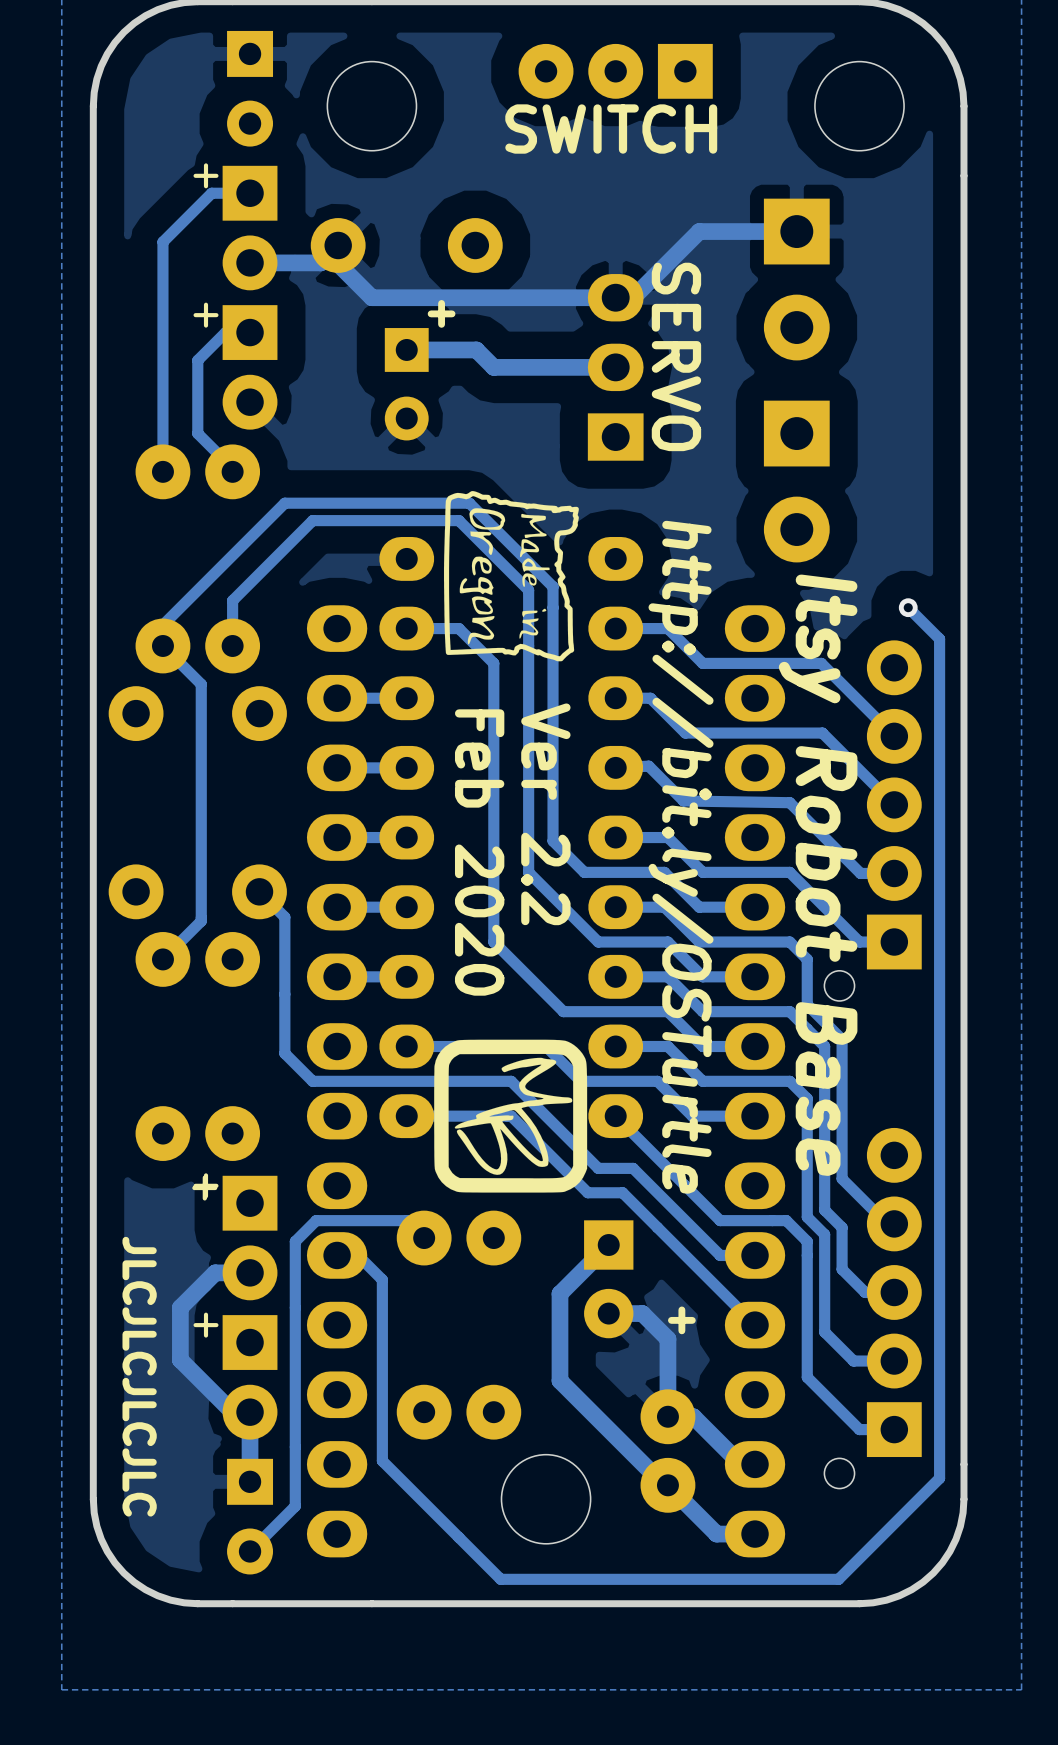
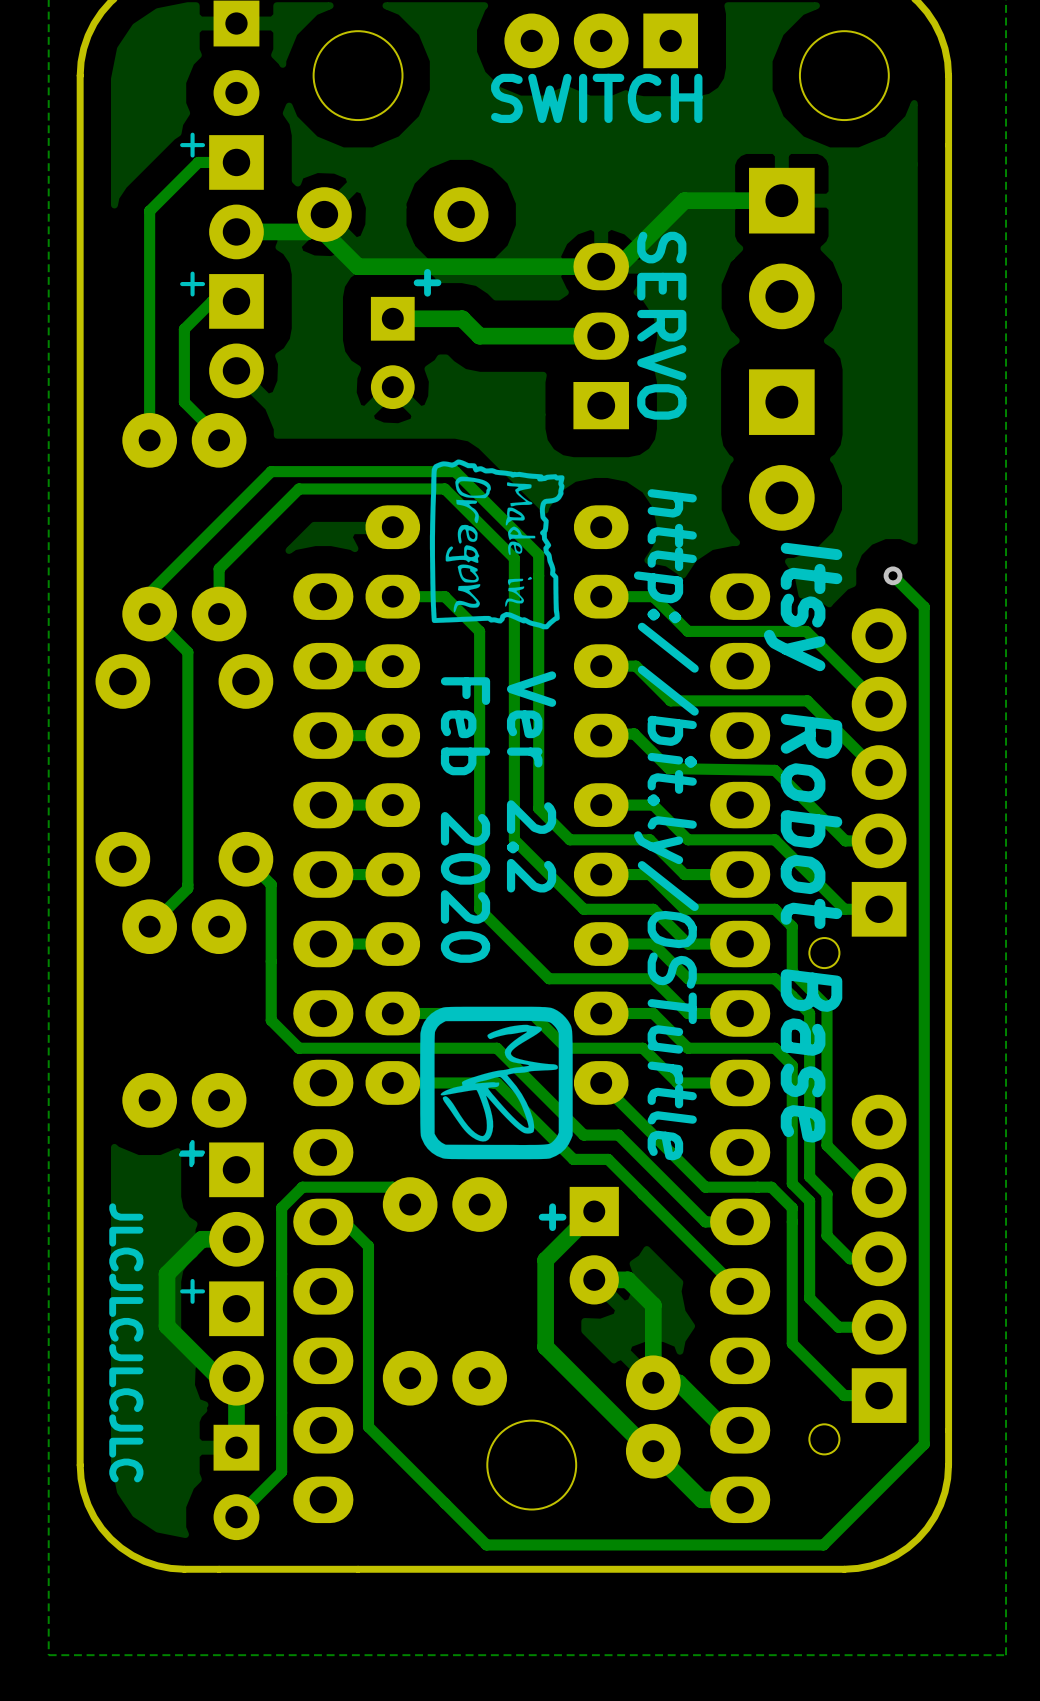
text position: + (681, 1320) -> + (552, 1217)

